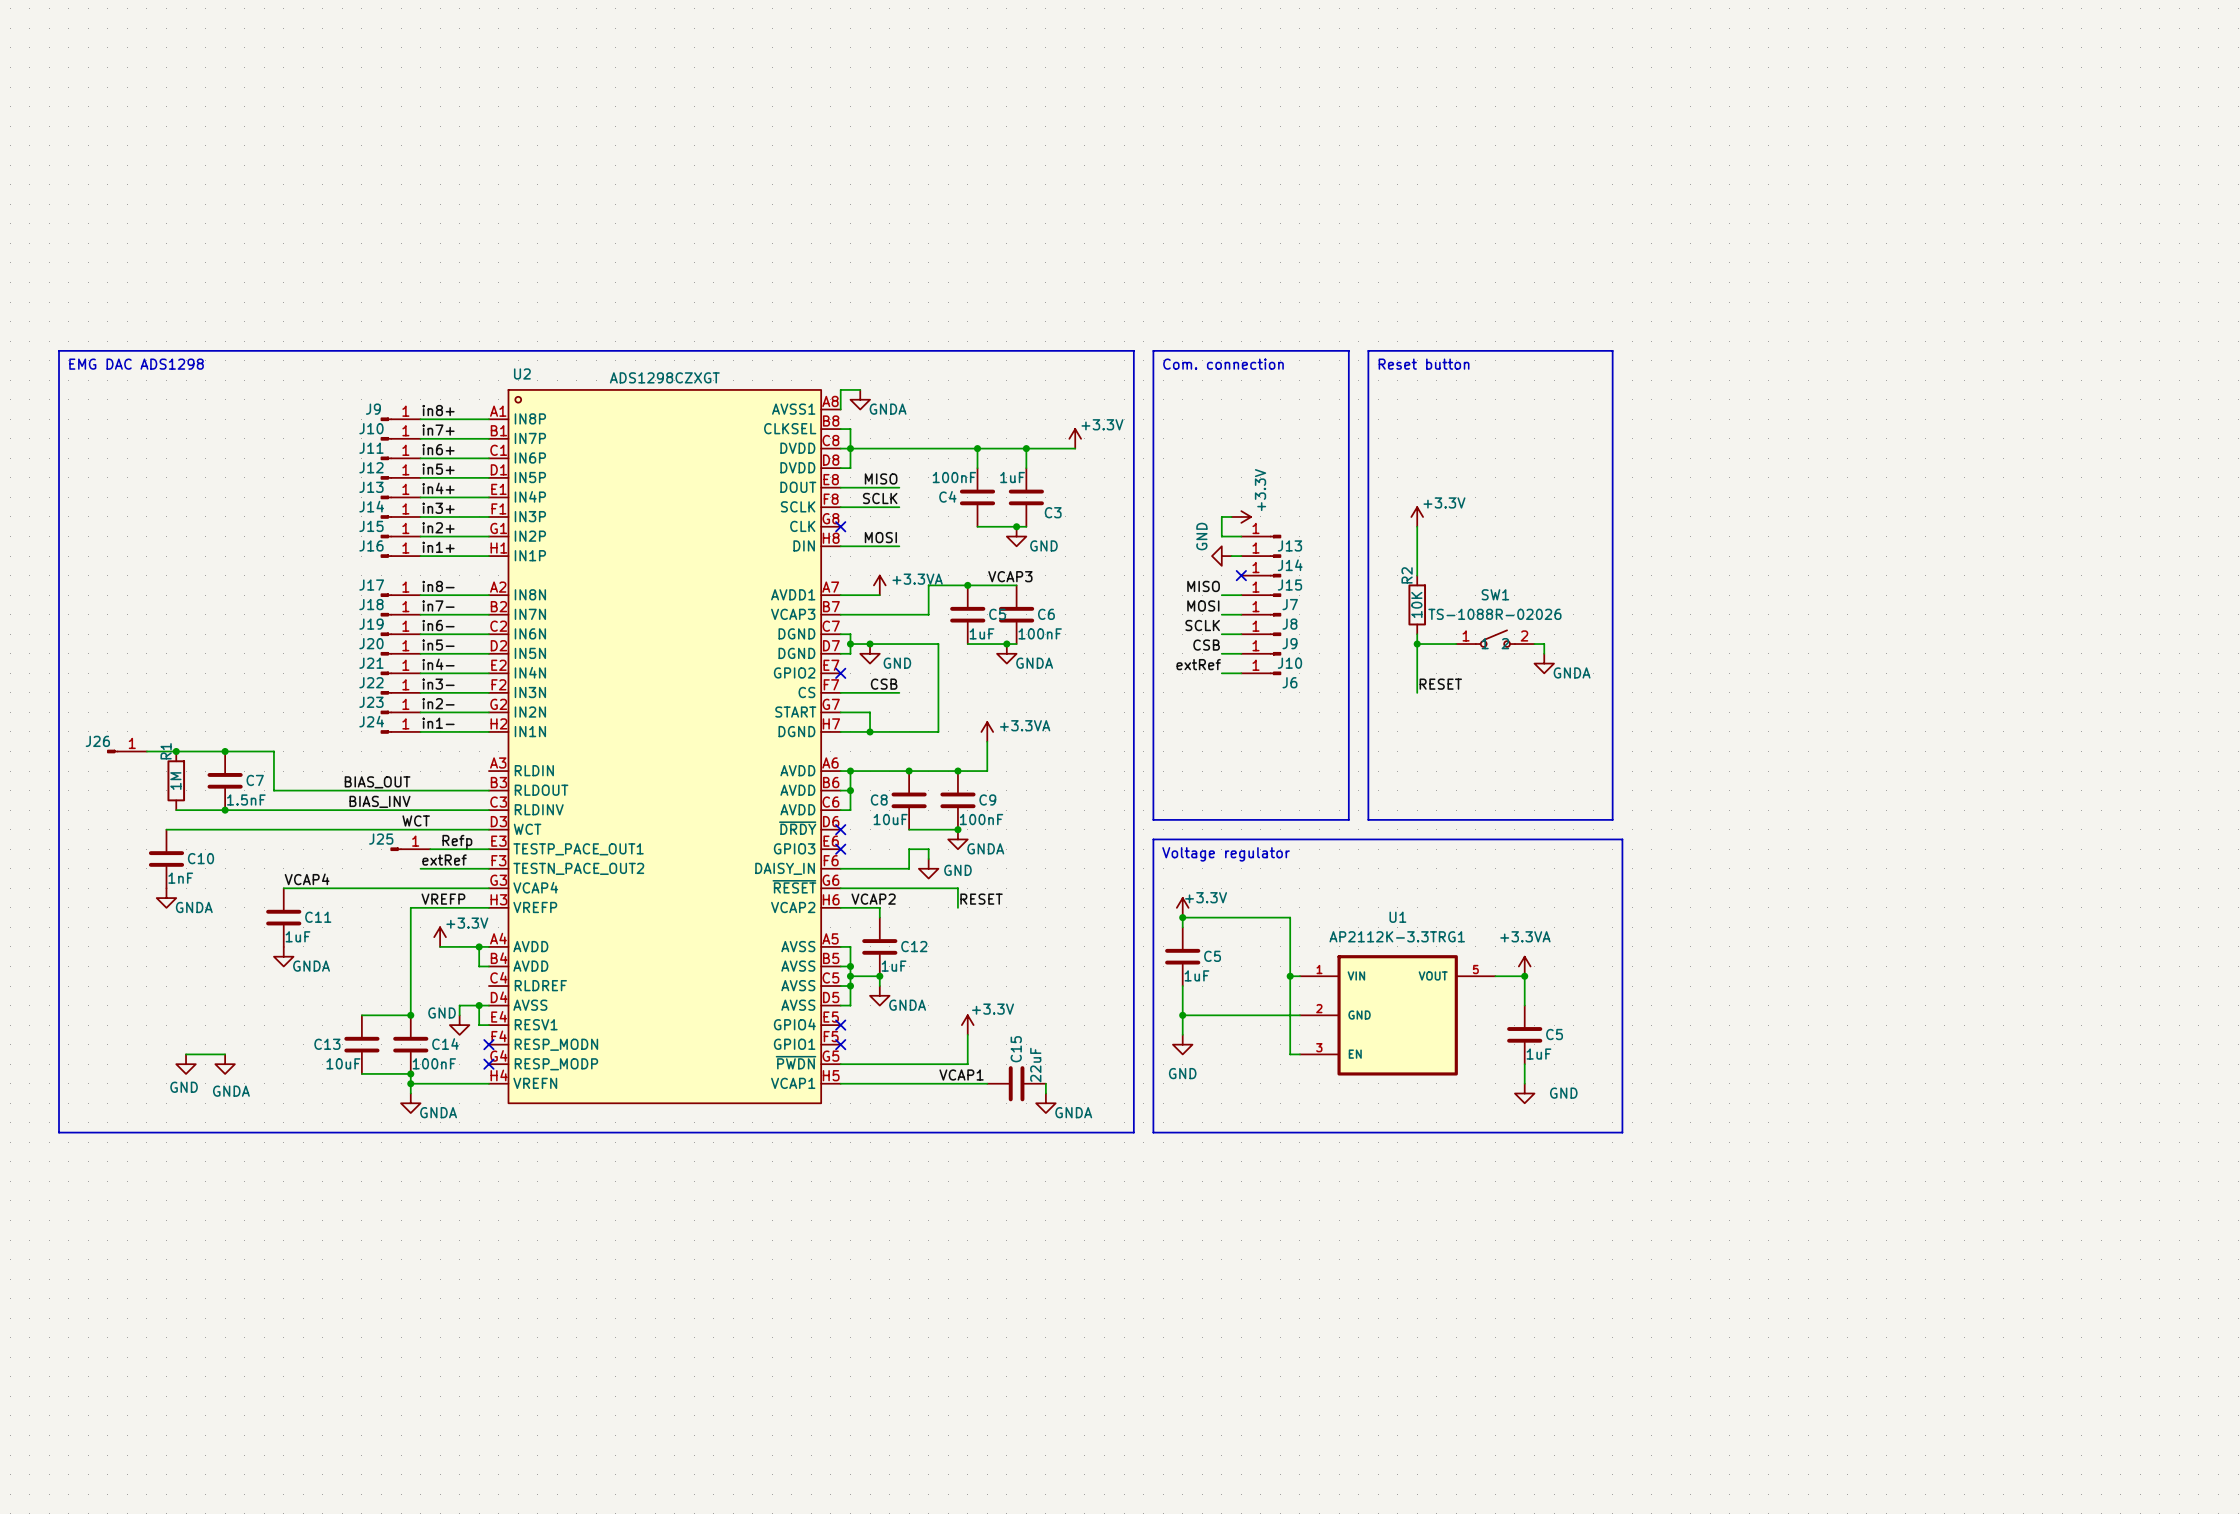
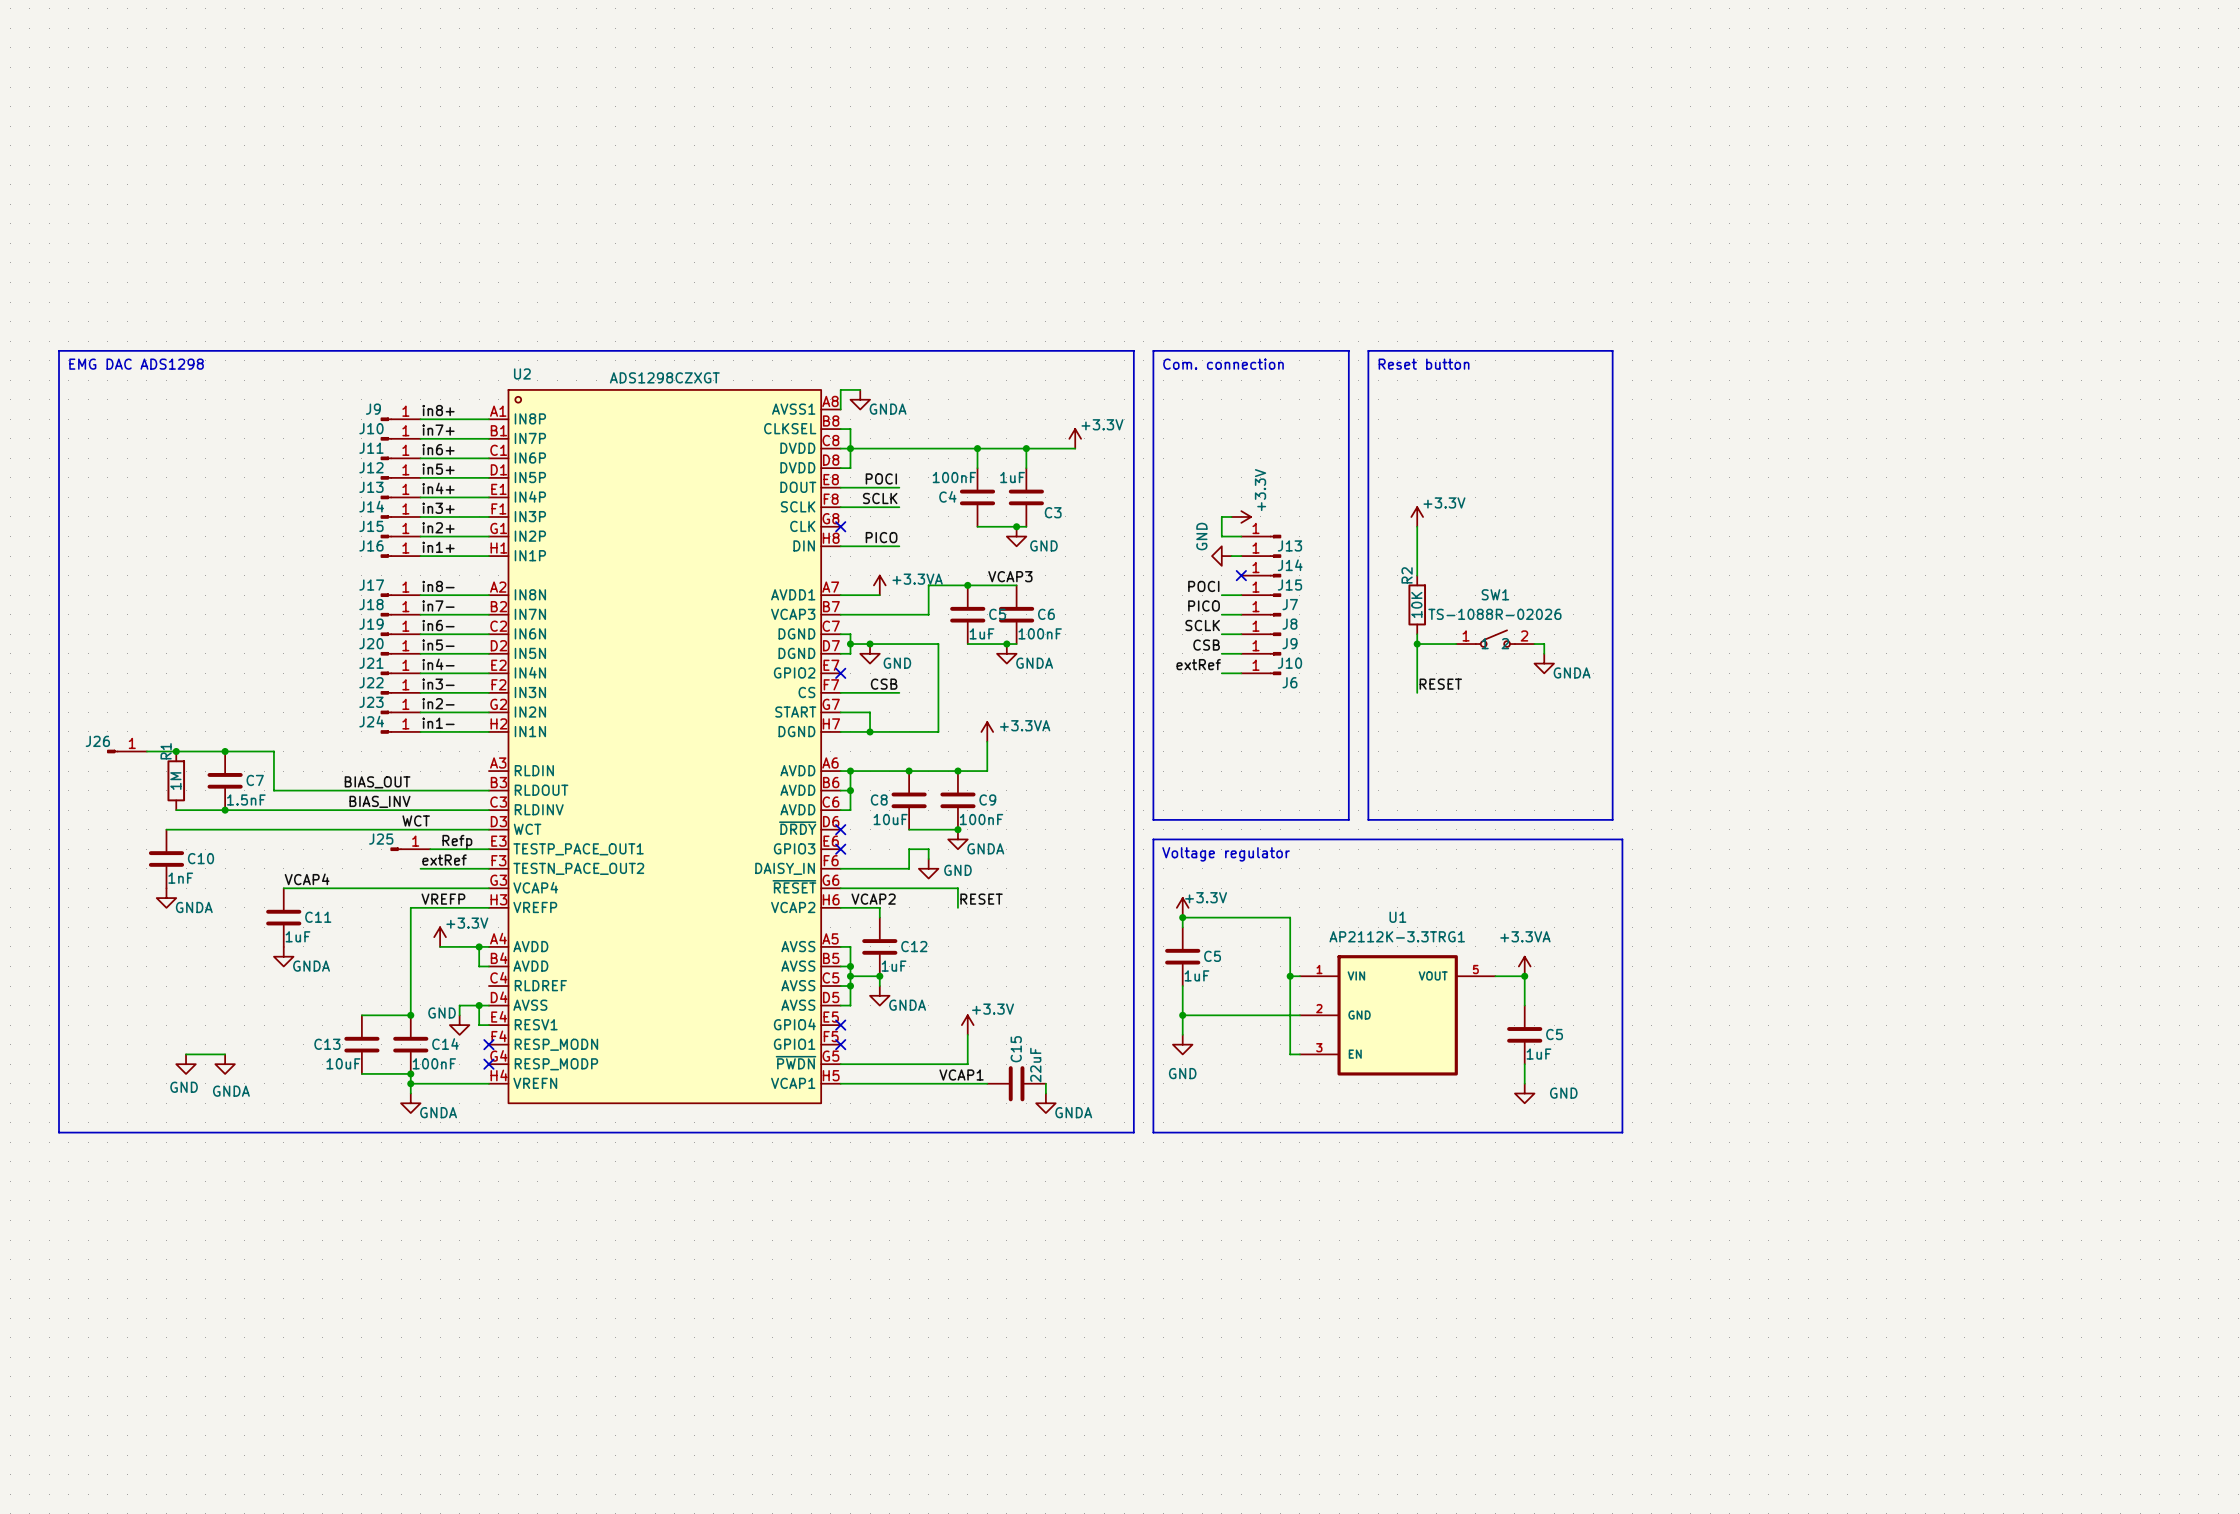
label: MISO (881, 478) -> POCI (881, 478)
label: MOSI (880, 537) -> PICO (881, 537)
label: MISO (1203, 586) -> POCI (1203, 586)
label: MOSI (1203, 605) -> PICO (1204, 605)

